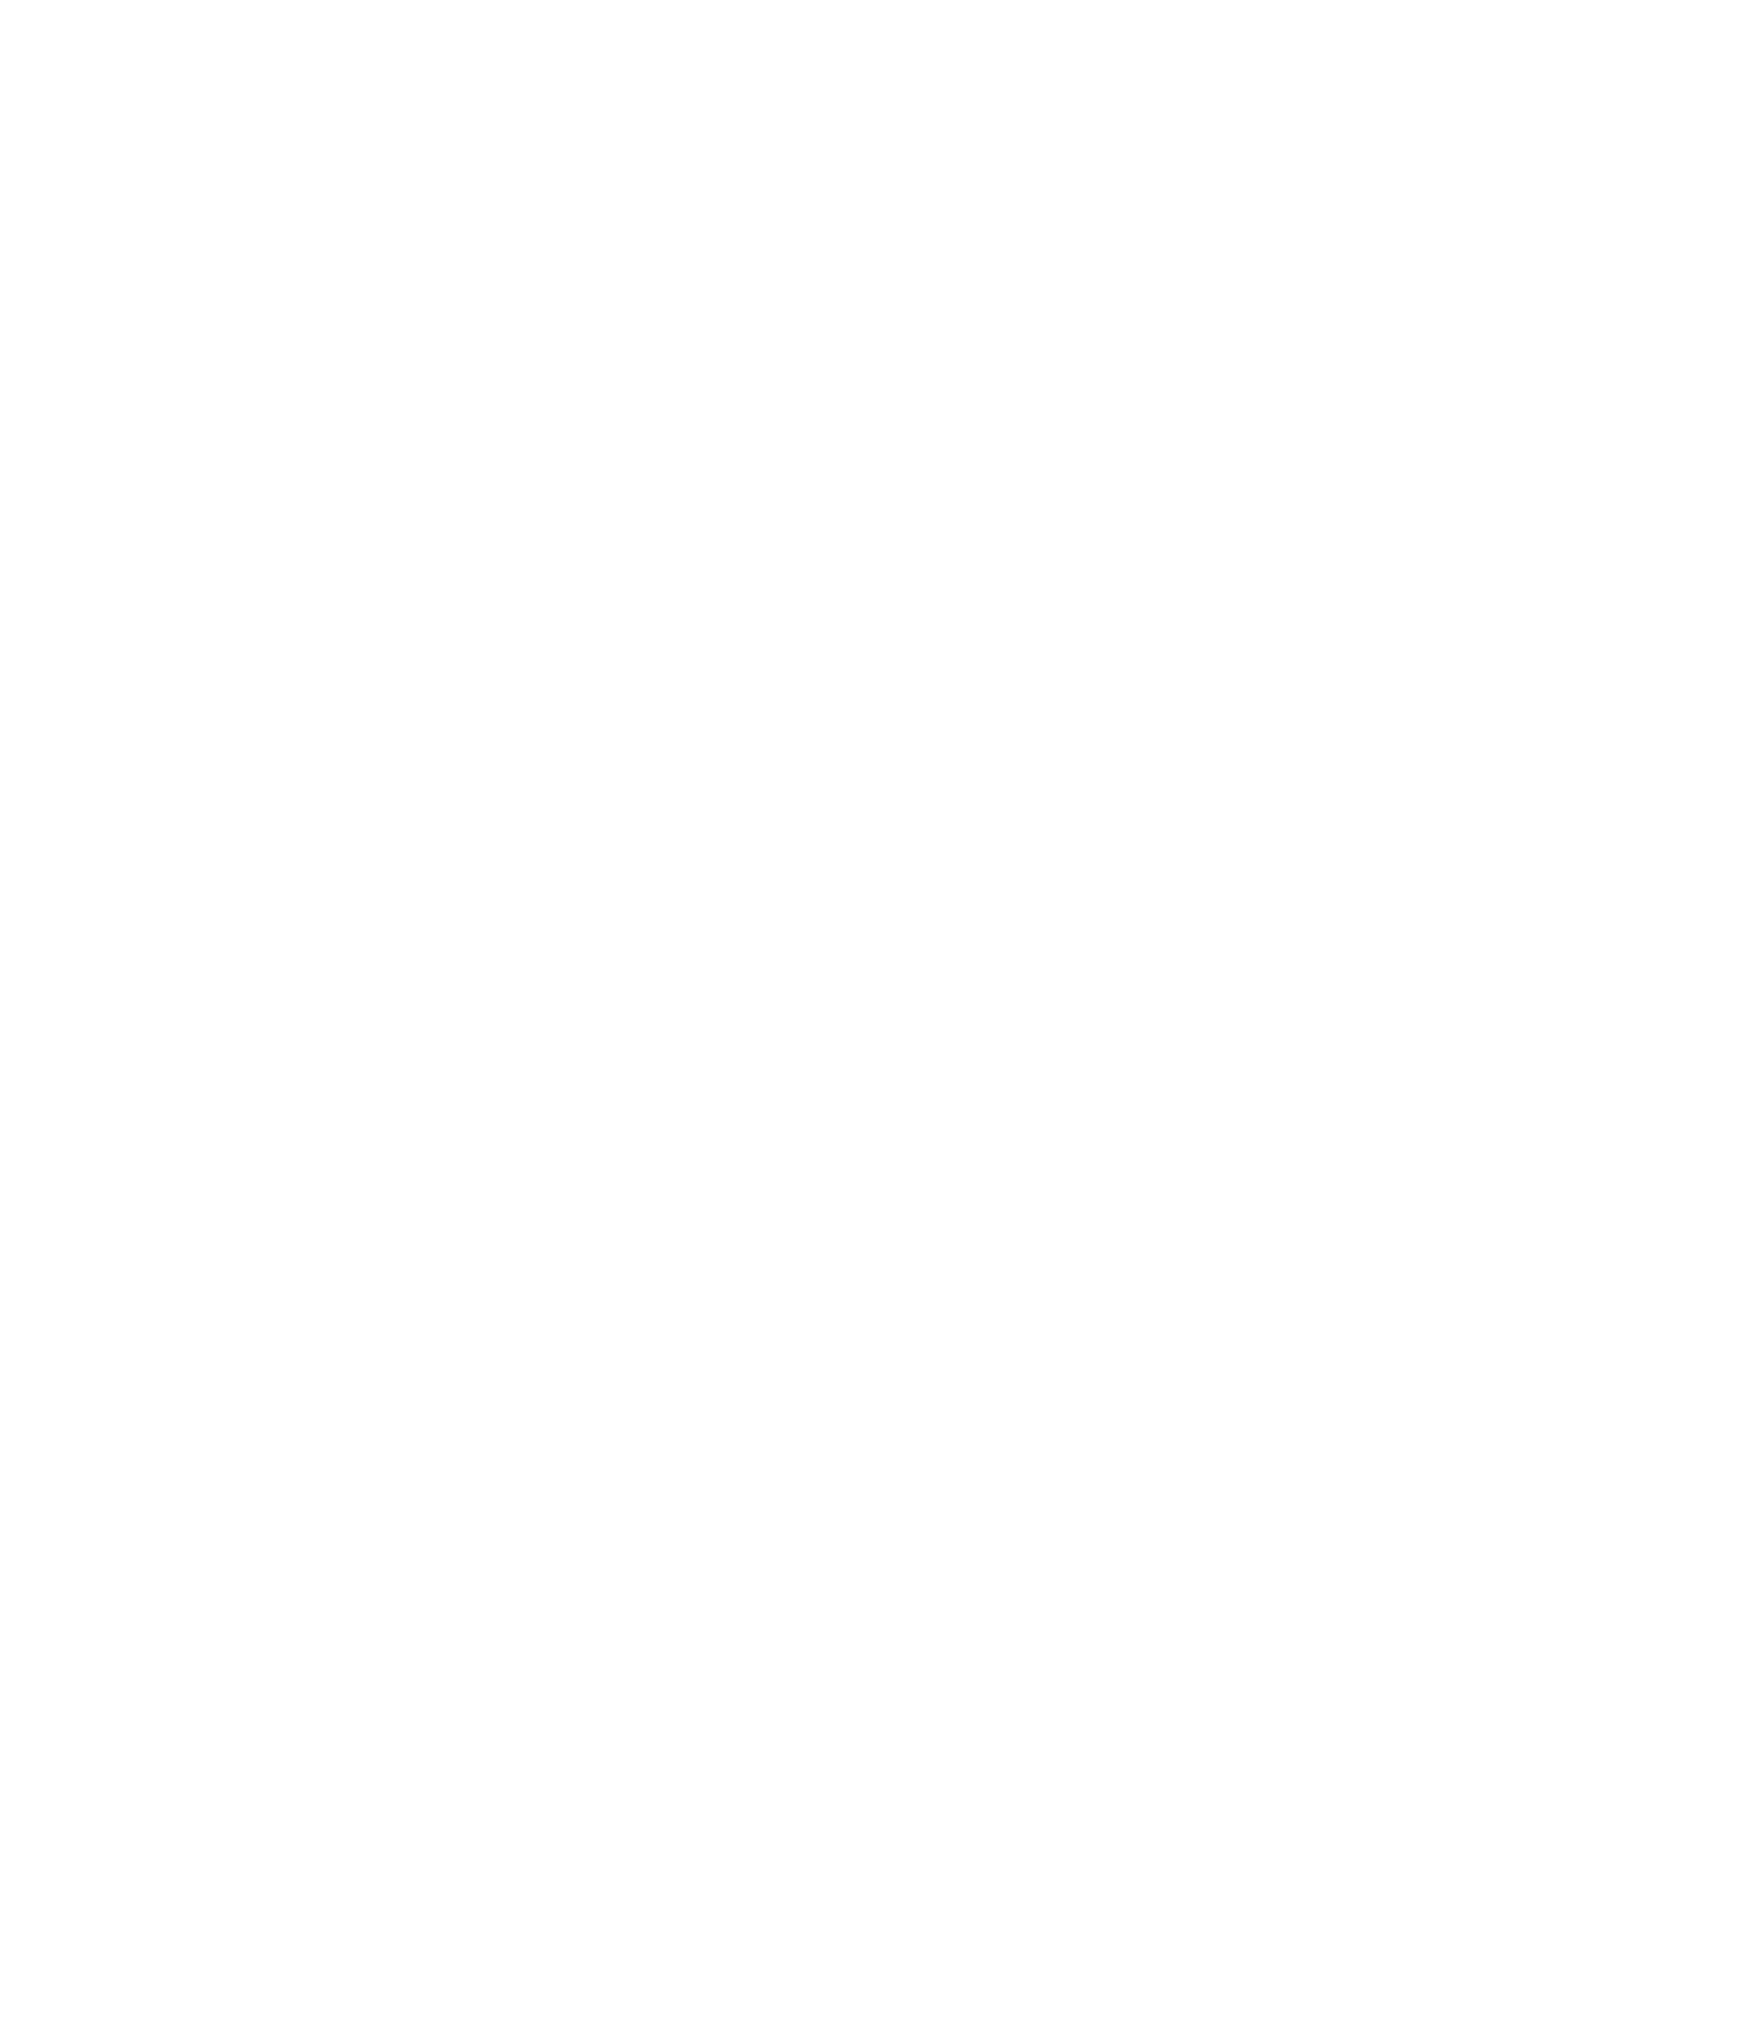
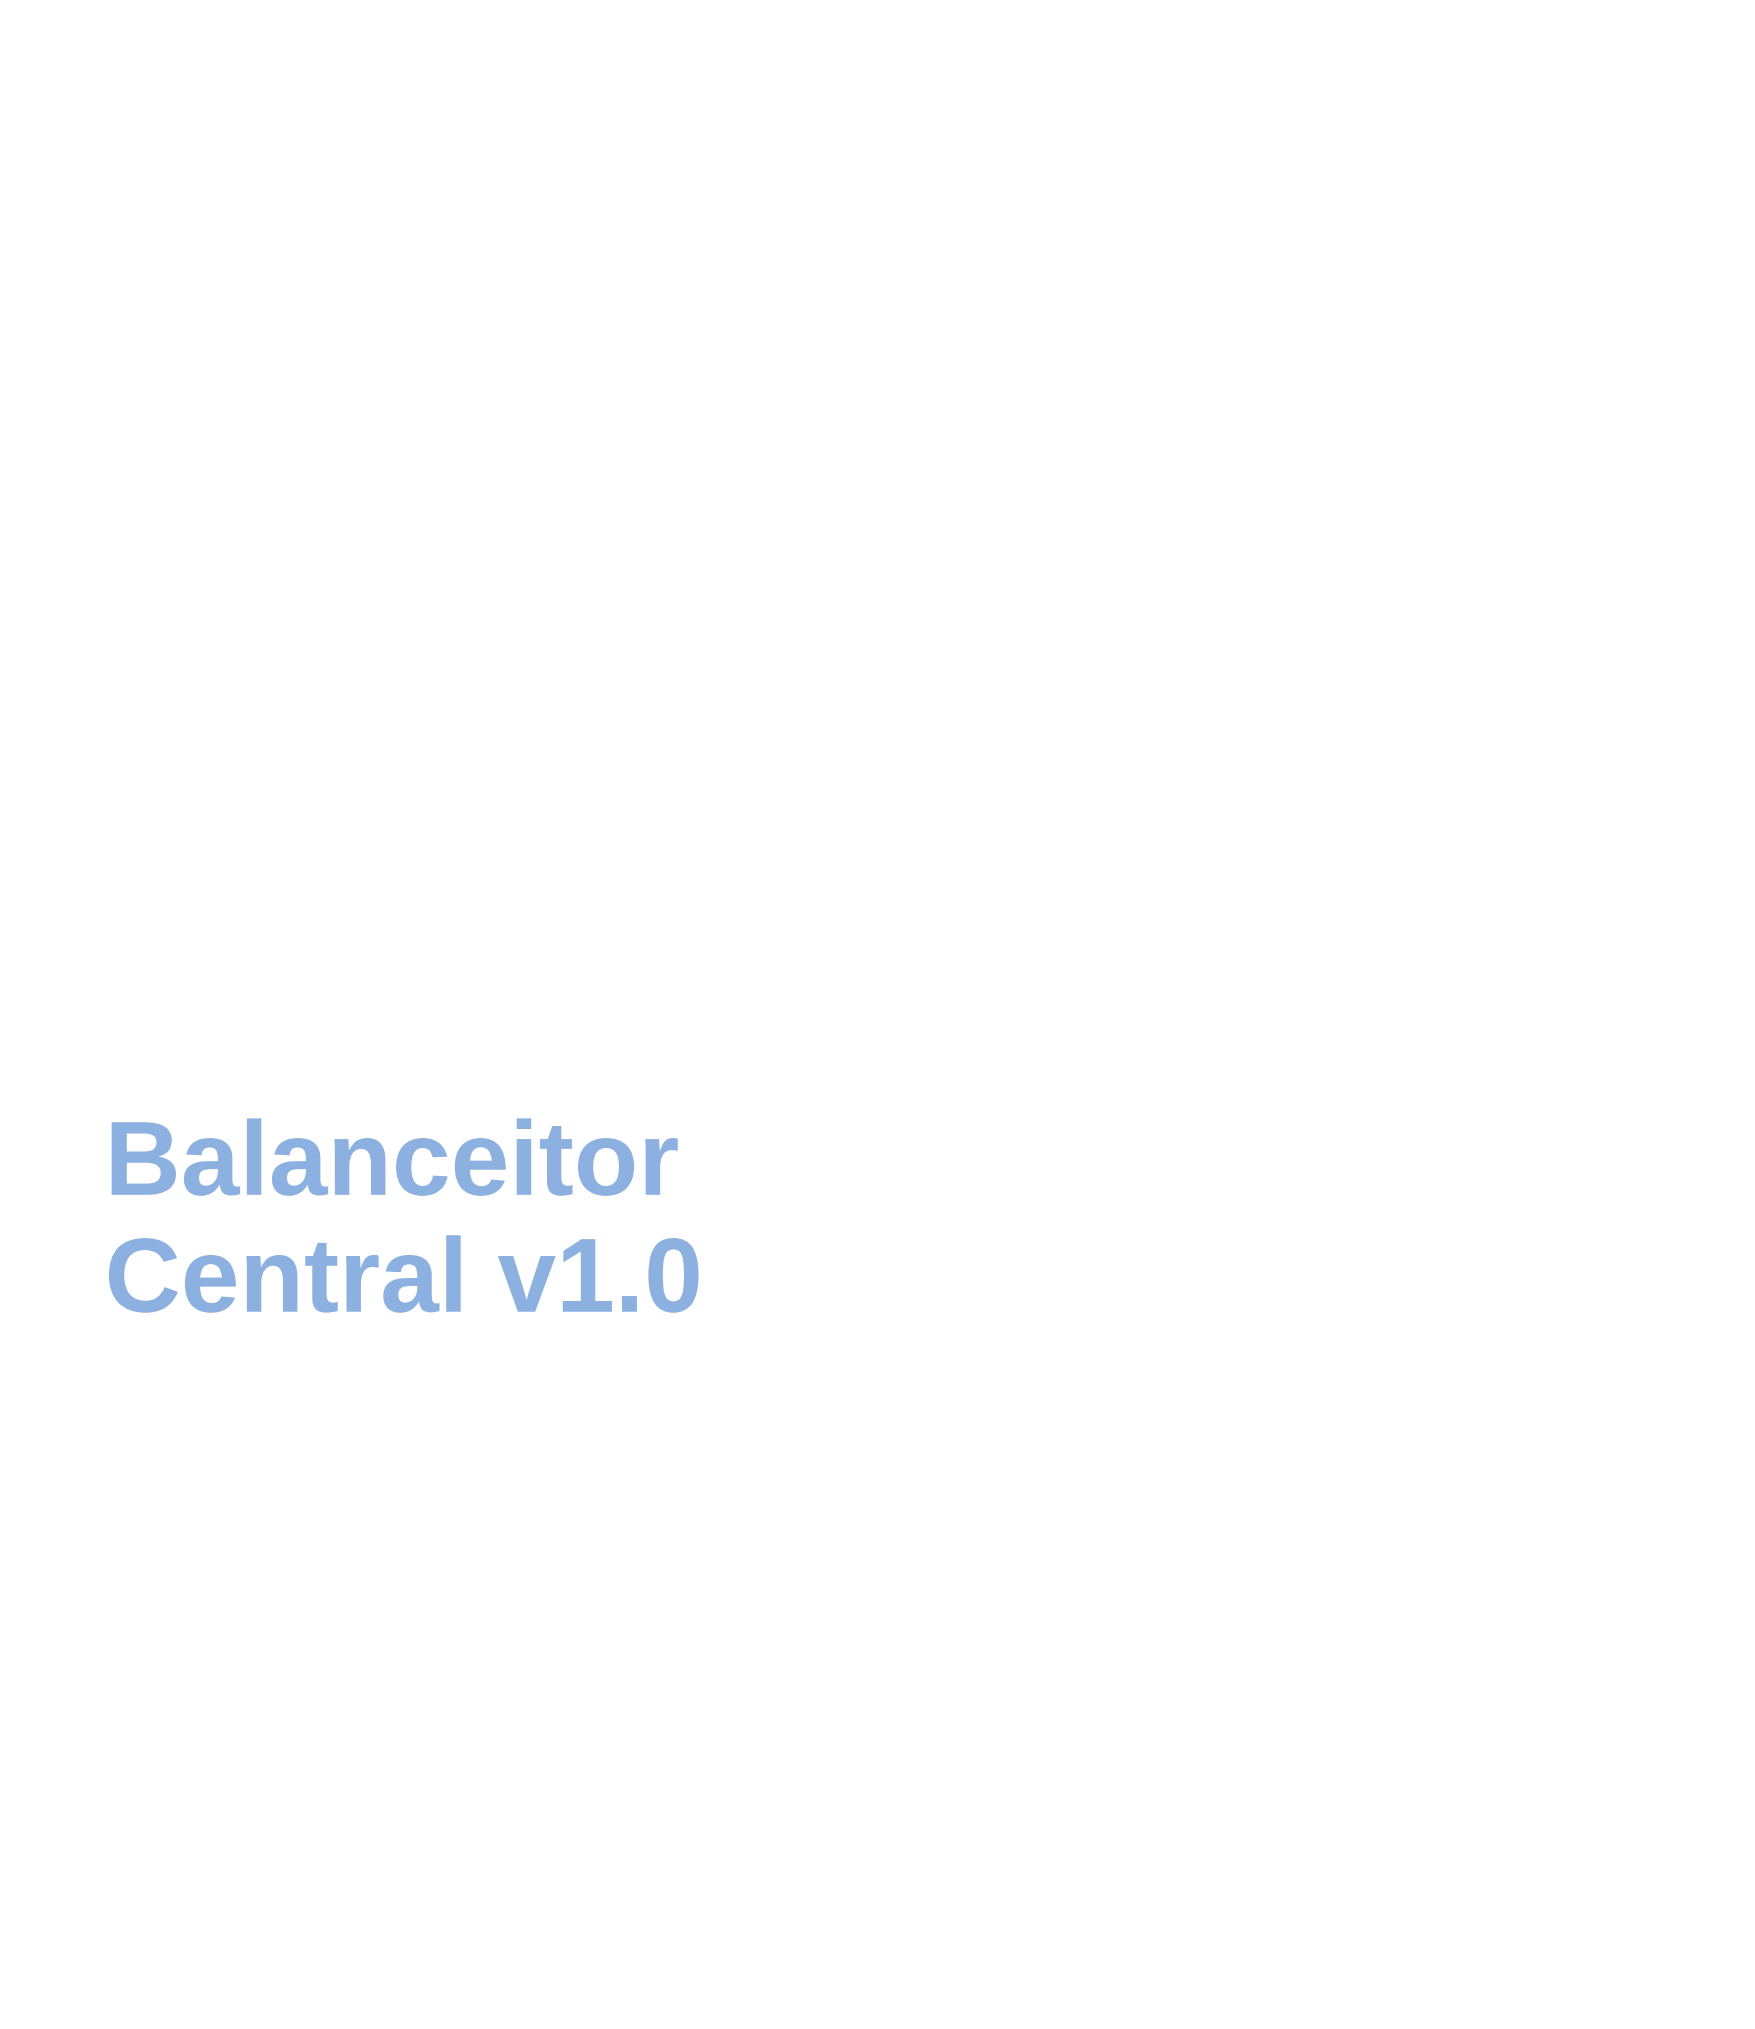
text: none -> Balanceitor (394, 1157)
text: none -> Central v1.0 (403, 1274)

